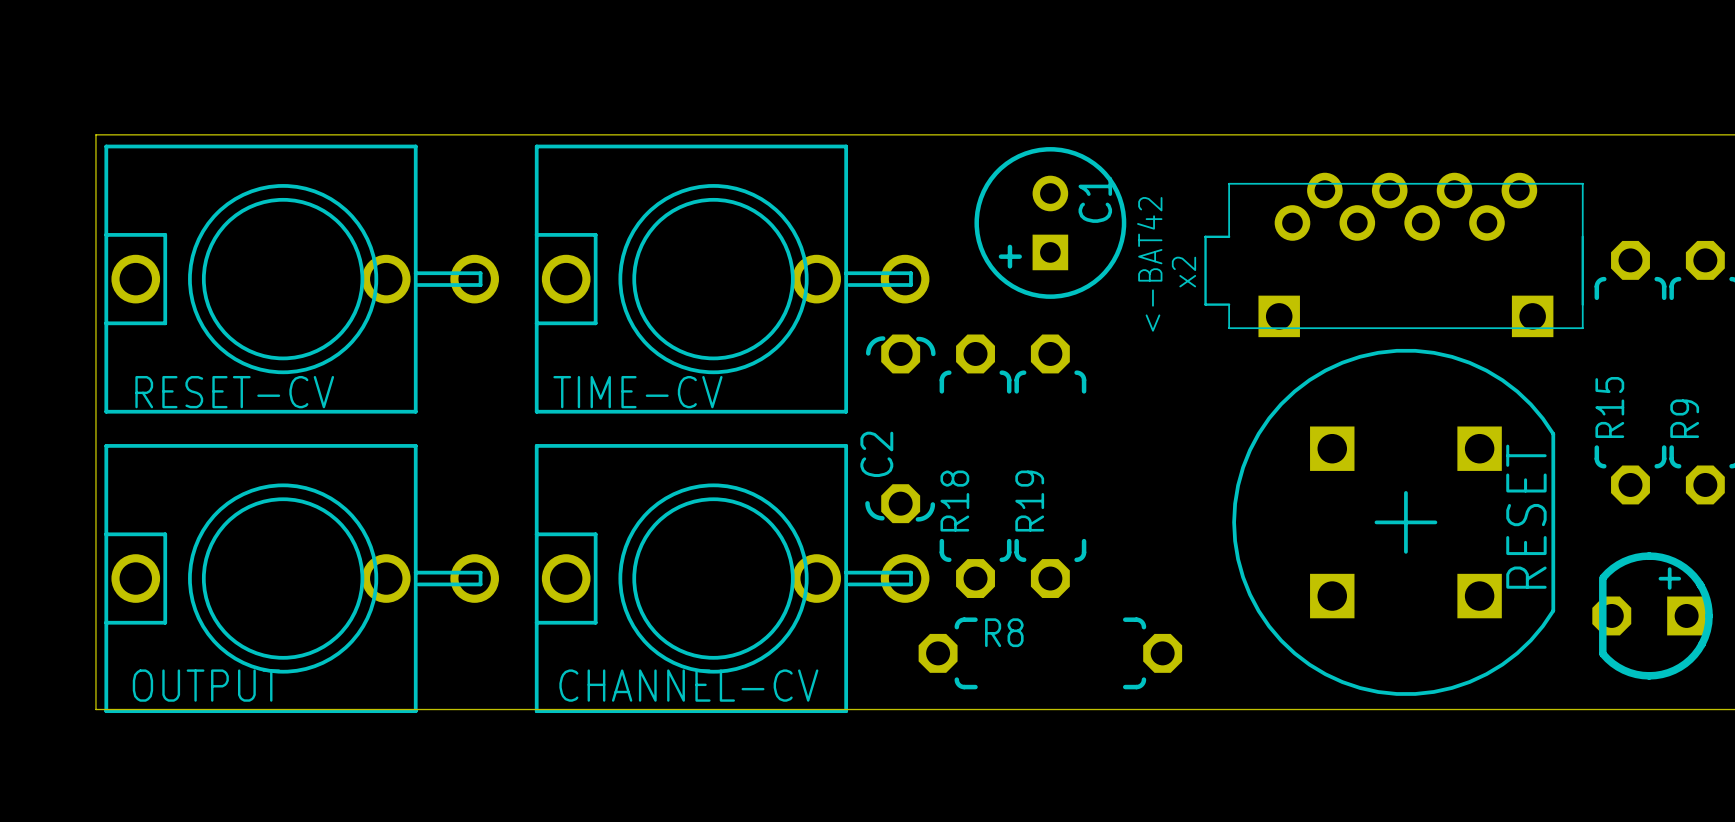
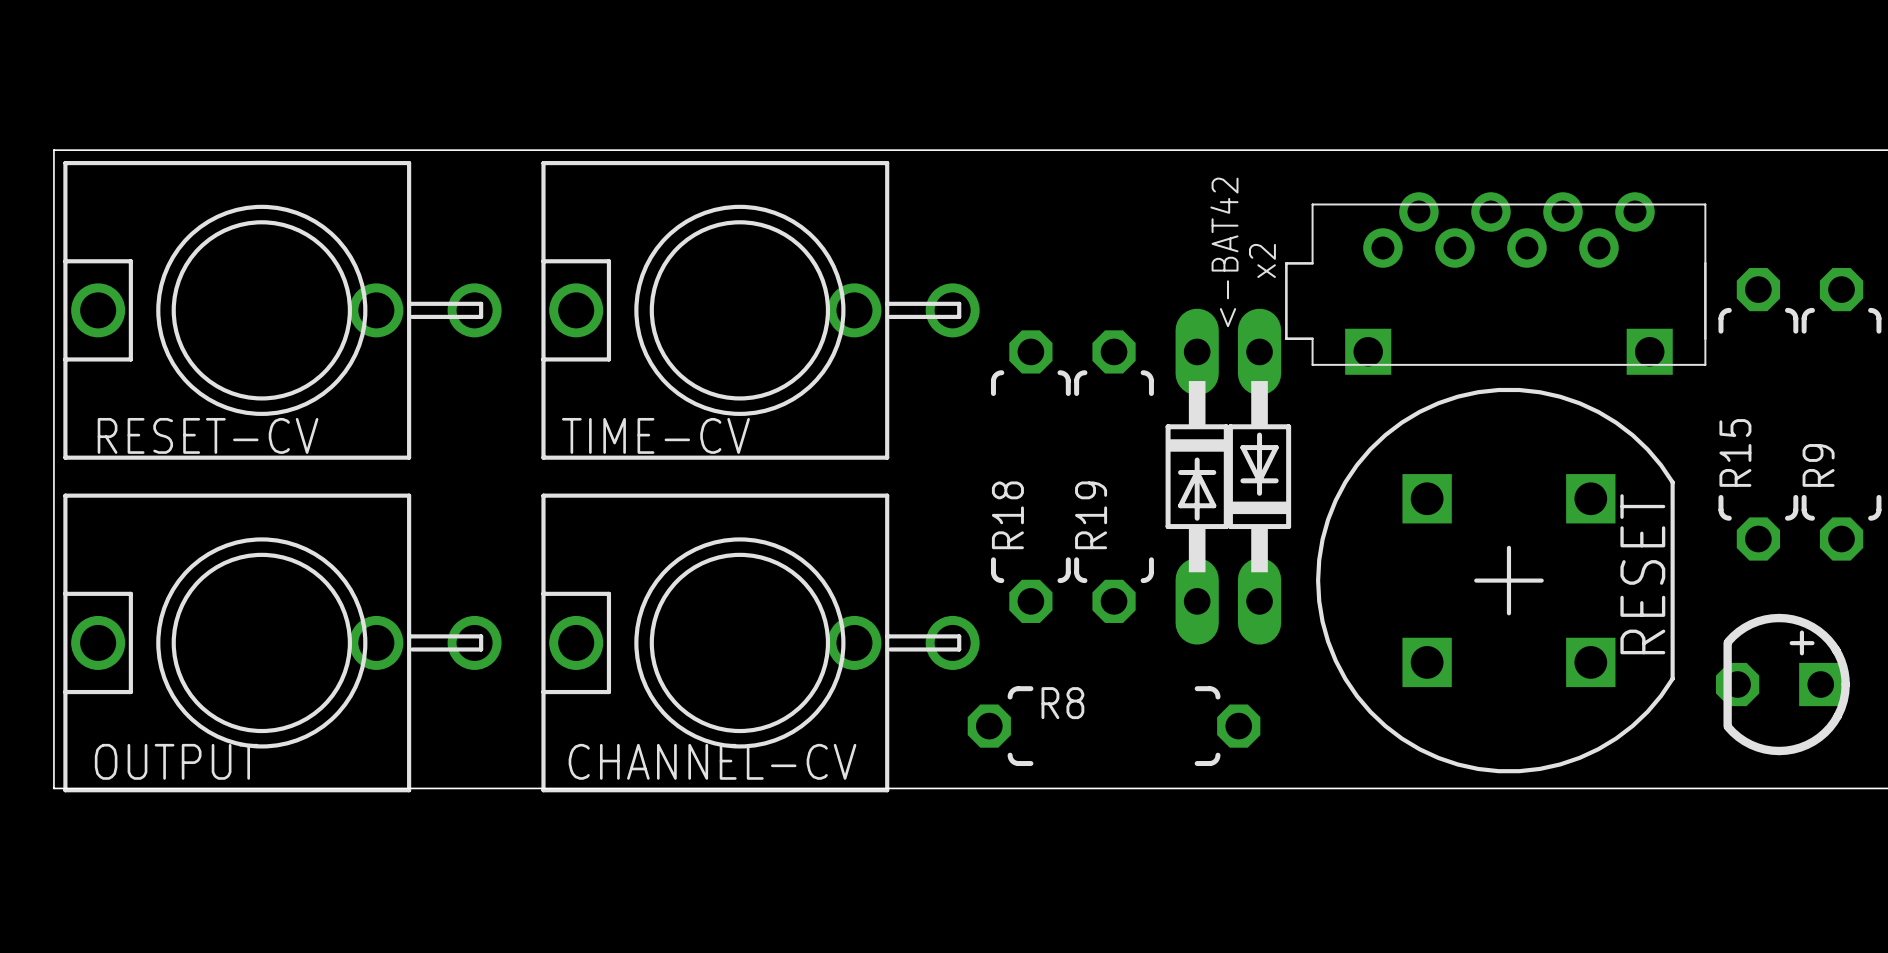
C1: (1050, 222) -> none
text position: <-BAT42 (1149, 264) -> <-BAT42 (1224, 252)
text position: x2 (1183, 272) -> x2 (1262, 260)
C2: (900, 428) -> none
part: none -> (1197, 476)
part: none -> (1259, 476)
R18 position: (975, 466) -> (1030, 476)
R19 position: (1050, 466) -> (1114, 476)

